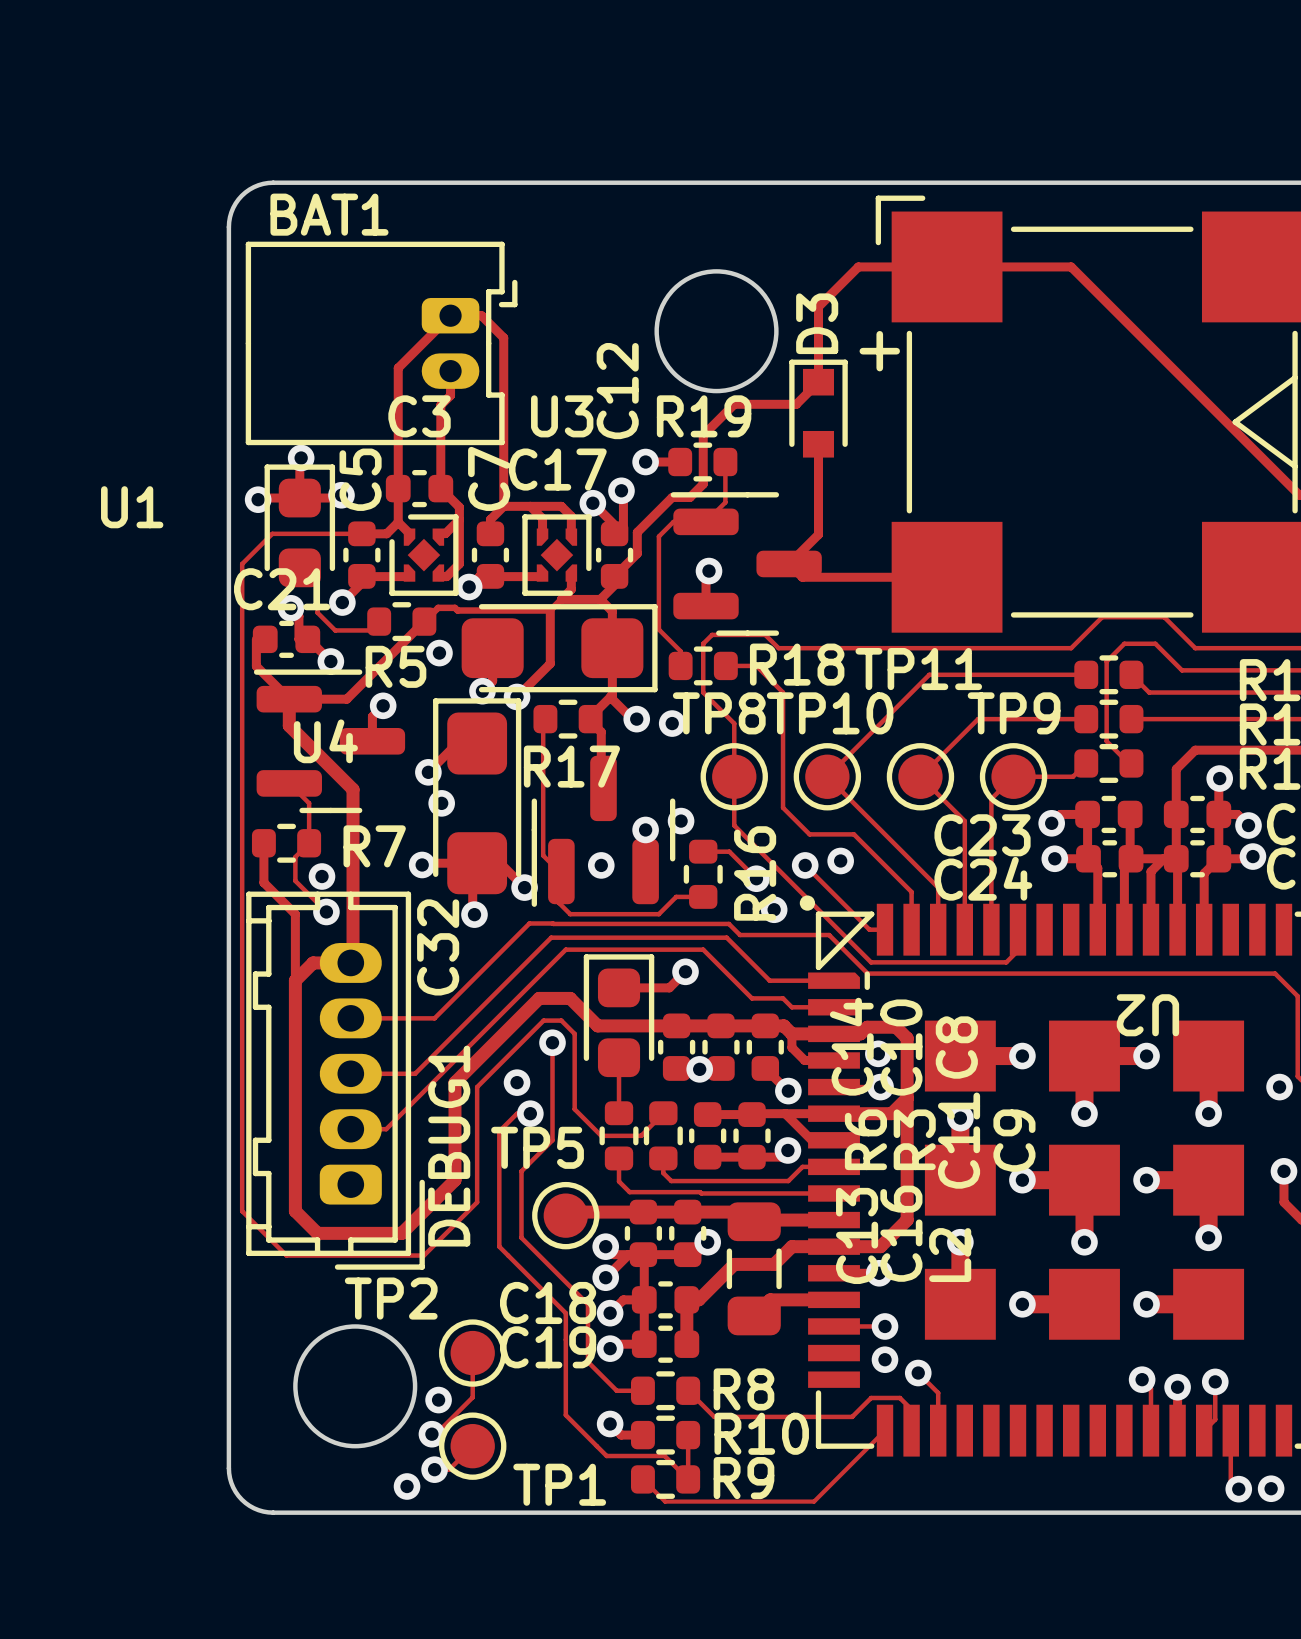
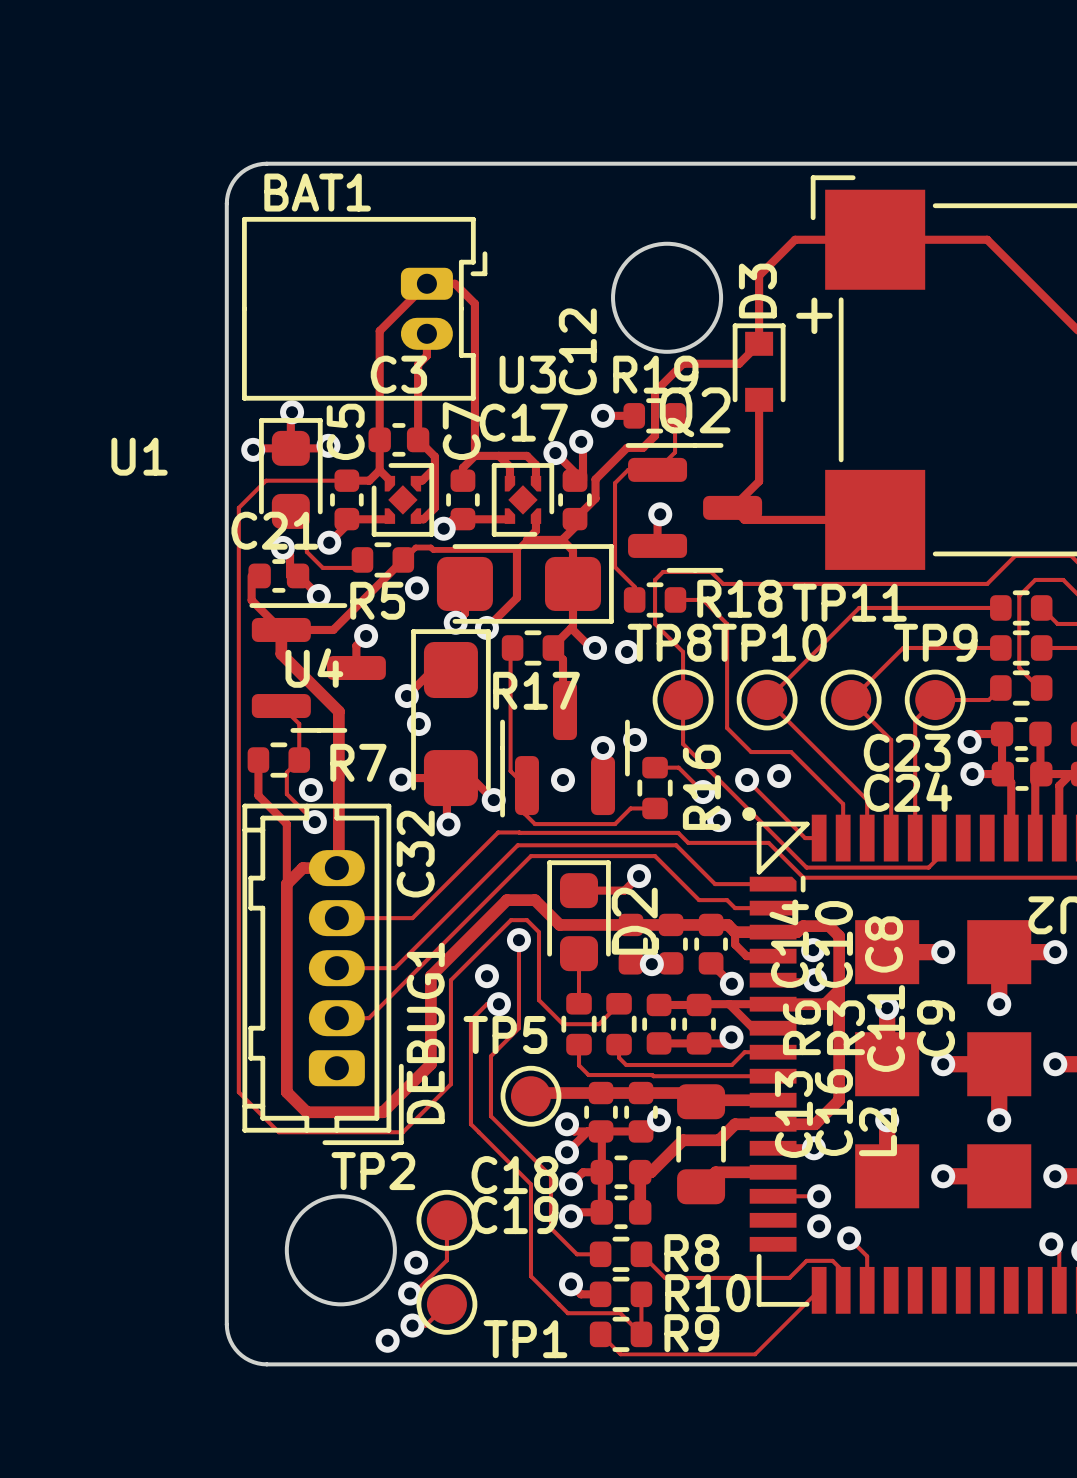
Q2 name: none -> Q2 (695, 412)
D2 name: none -> D2 (634, 921)

